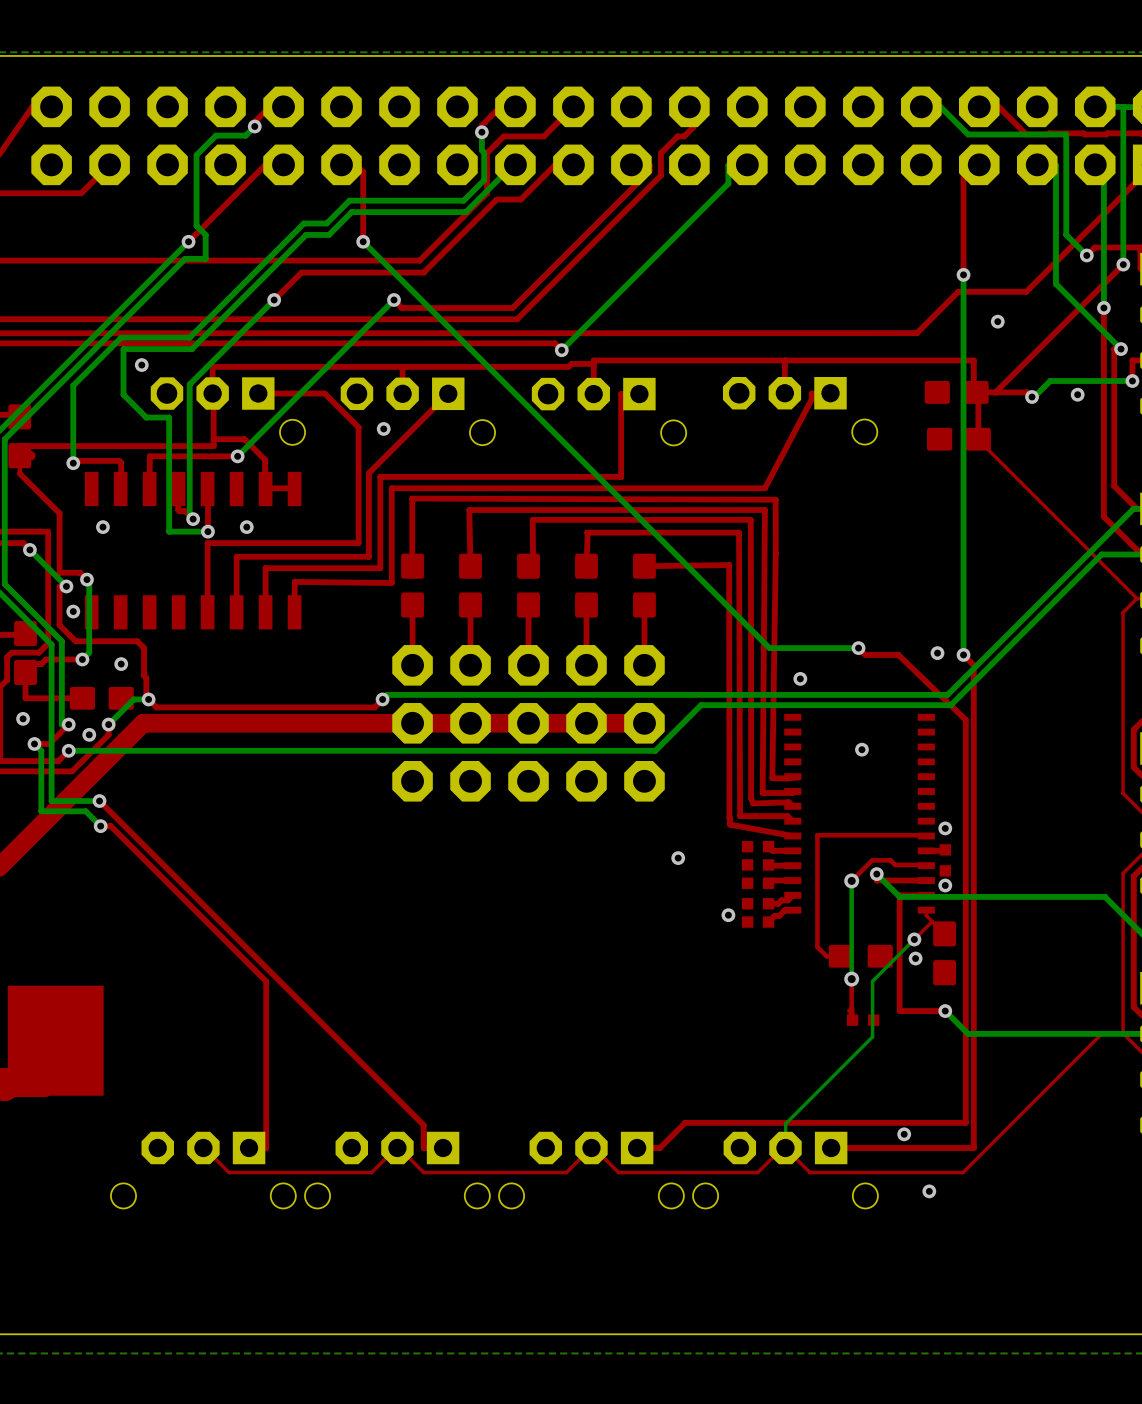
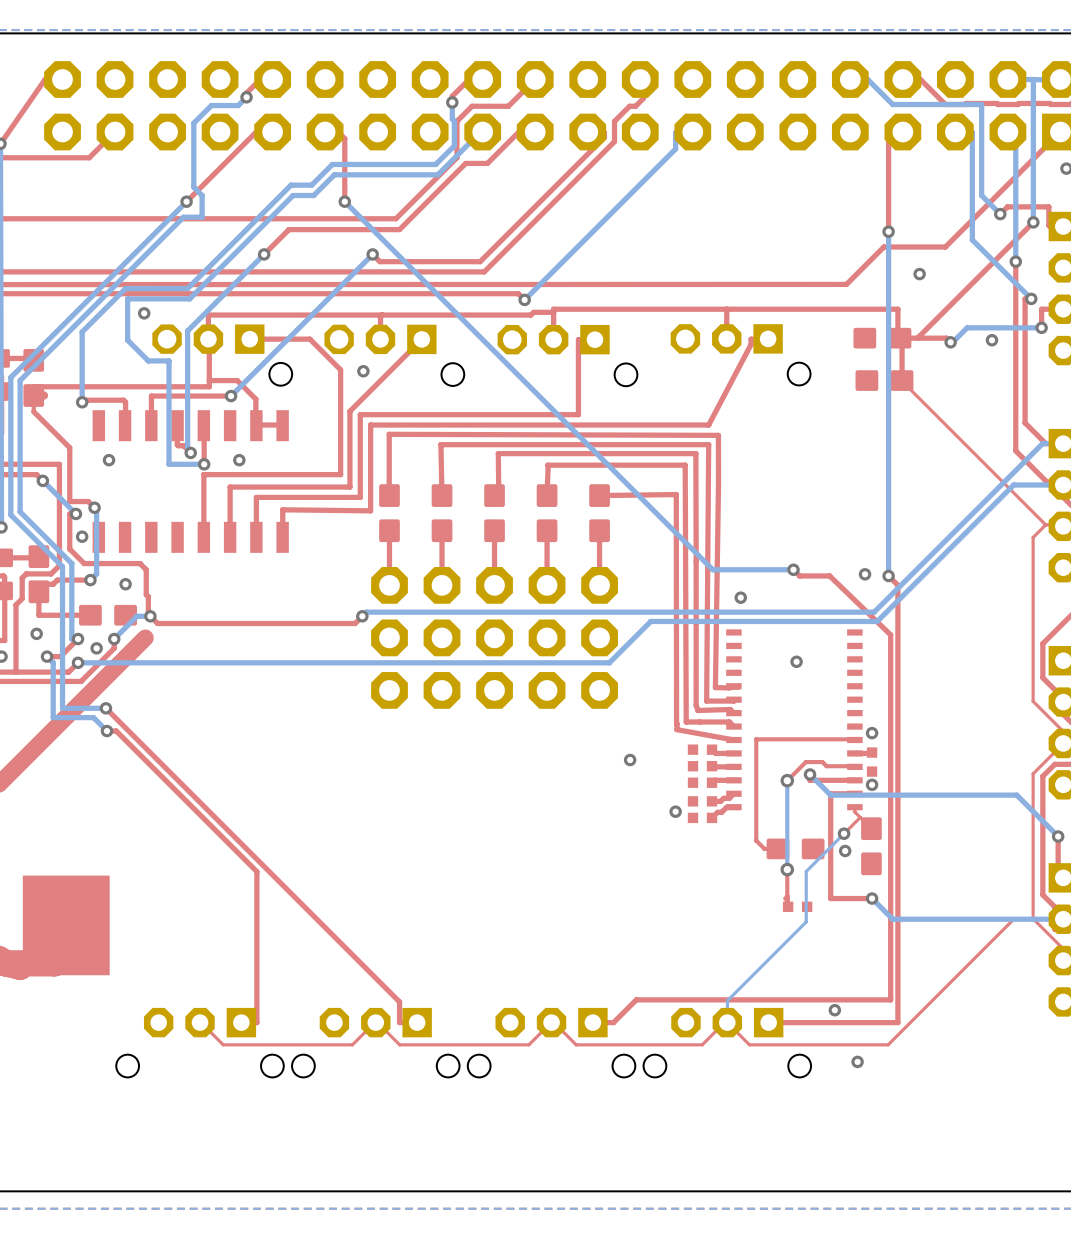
top track: (644, 723) (143, 723) -> none

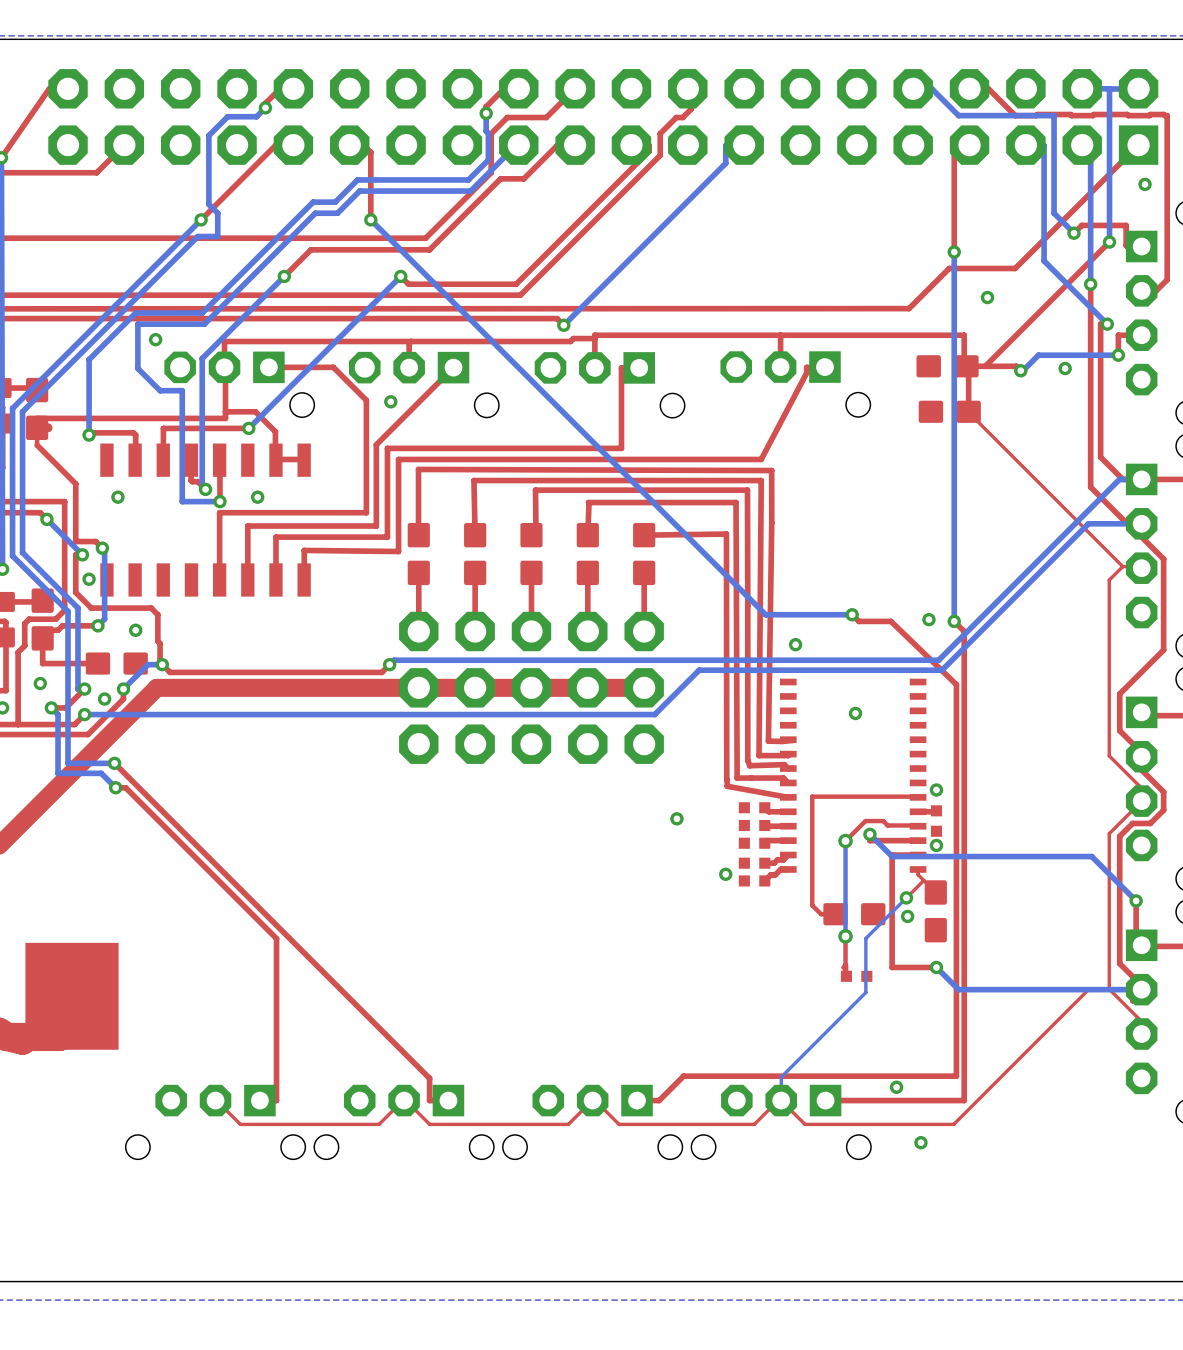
top track: none -> (644, 687) (156, 687)

